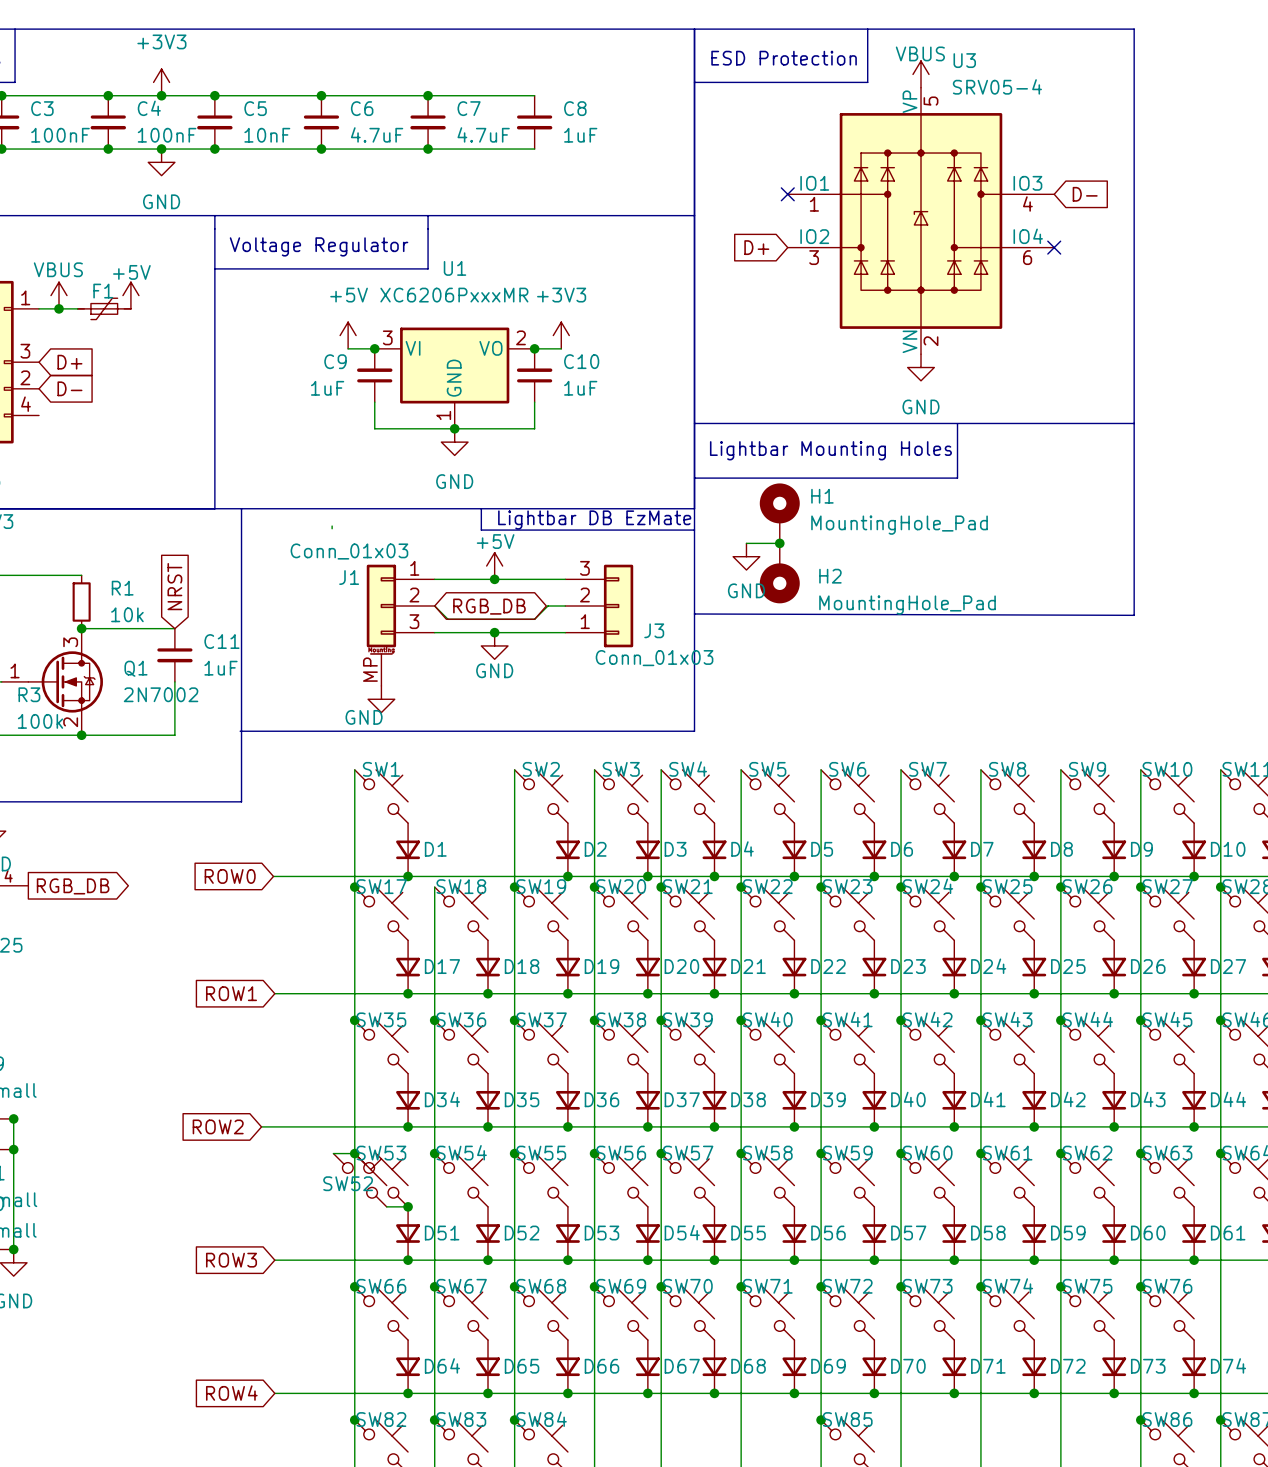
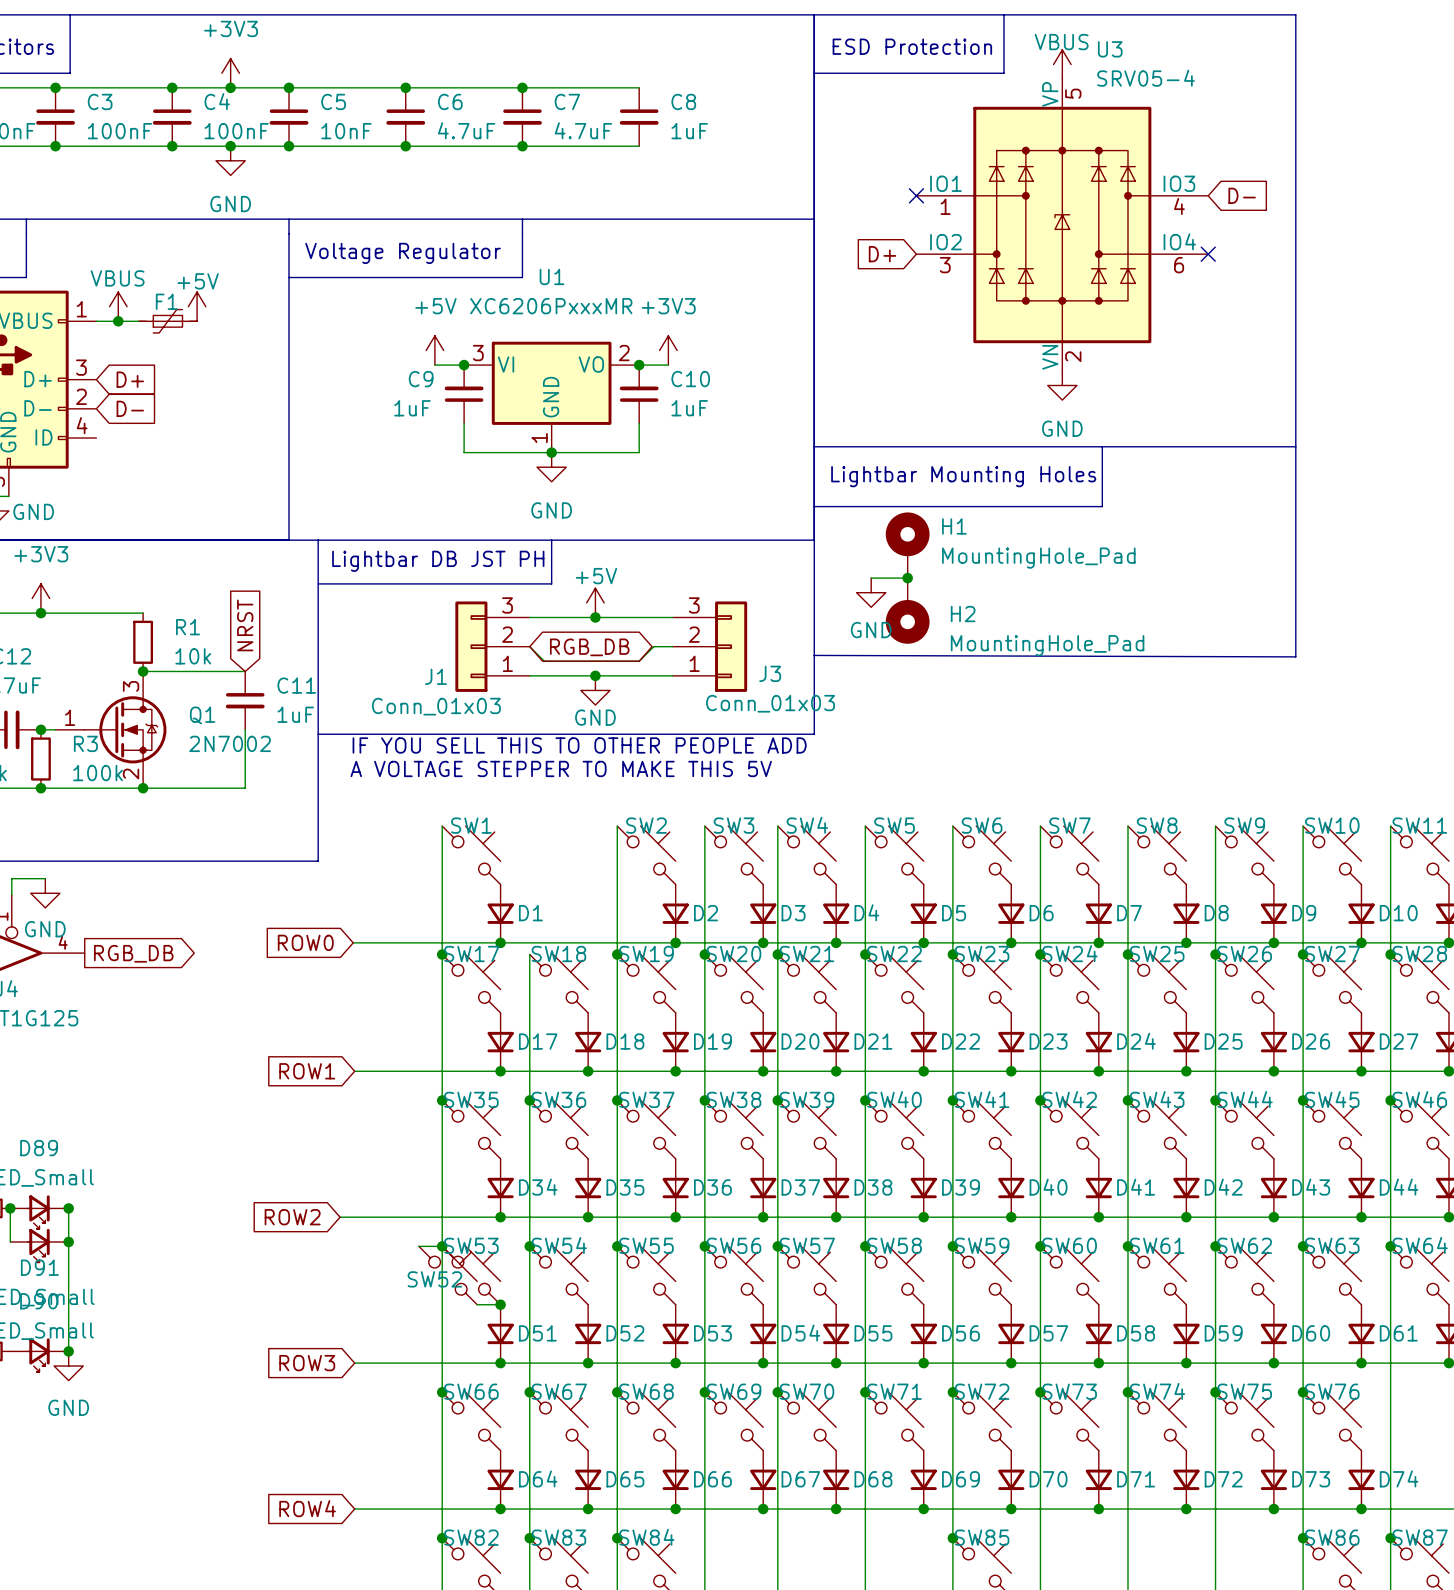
line: none -> (551, 540) (551, 583) (318, 583)
line: (481, 508) (481, 530) (694, 530) -> none
text: Lightbar DB EzMate (594, 520) -> none
wire: (332, 526) (332, 528) -> none
text: none -> Lightbar DB JST PH (438, 561)
J1 value position: Conn_01x03 (349, 551) -> Conn_01x03 (436, 706)
J1 symbol: [366, 564, 435, 686] -> [455, 601, 530, 692]
J1 name position: J1 (349, 577) -> J1 (436, 676)
line: (694, 685) (694, 731) (240, 731) -> (814, 734) (318, 734)
text: none -> IF YOU SELL THIS TO OTHER PEOPLE ADD (579, 745)
power symbol: GND (381, 699) -> none
text: none -> A VOLTAGE STEPPER TO MAKE THIS 5V (561, 768)

